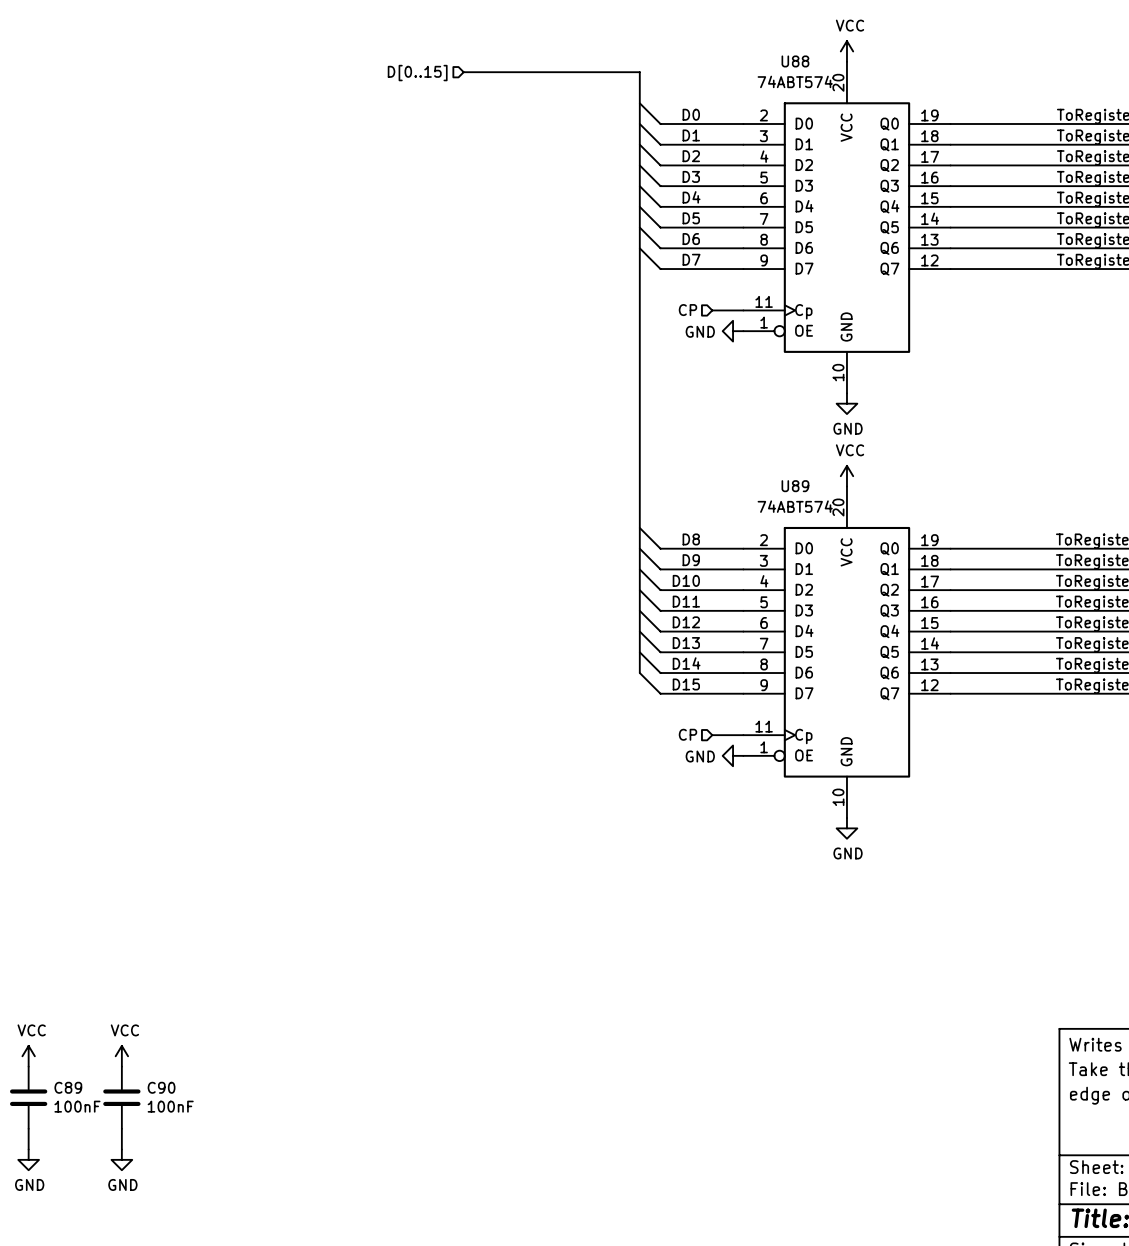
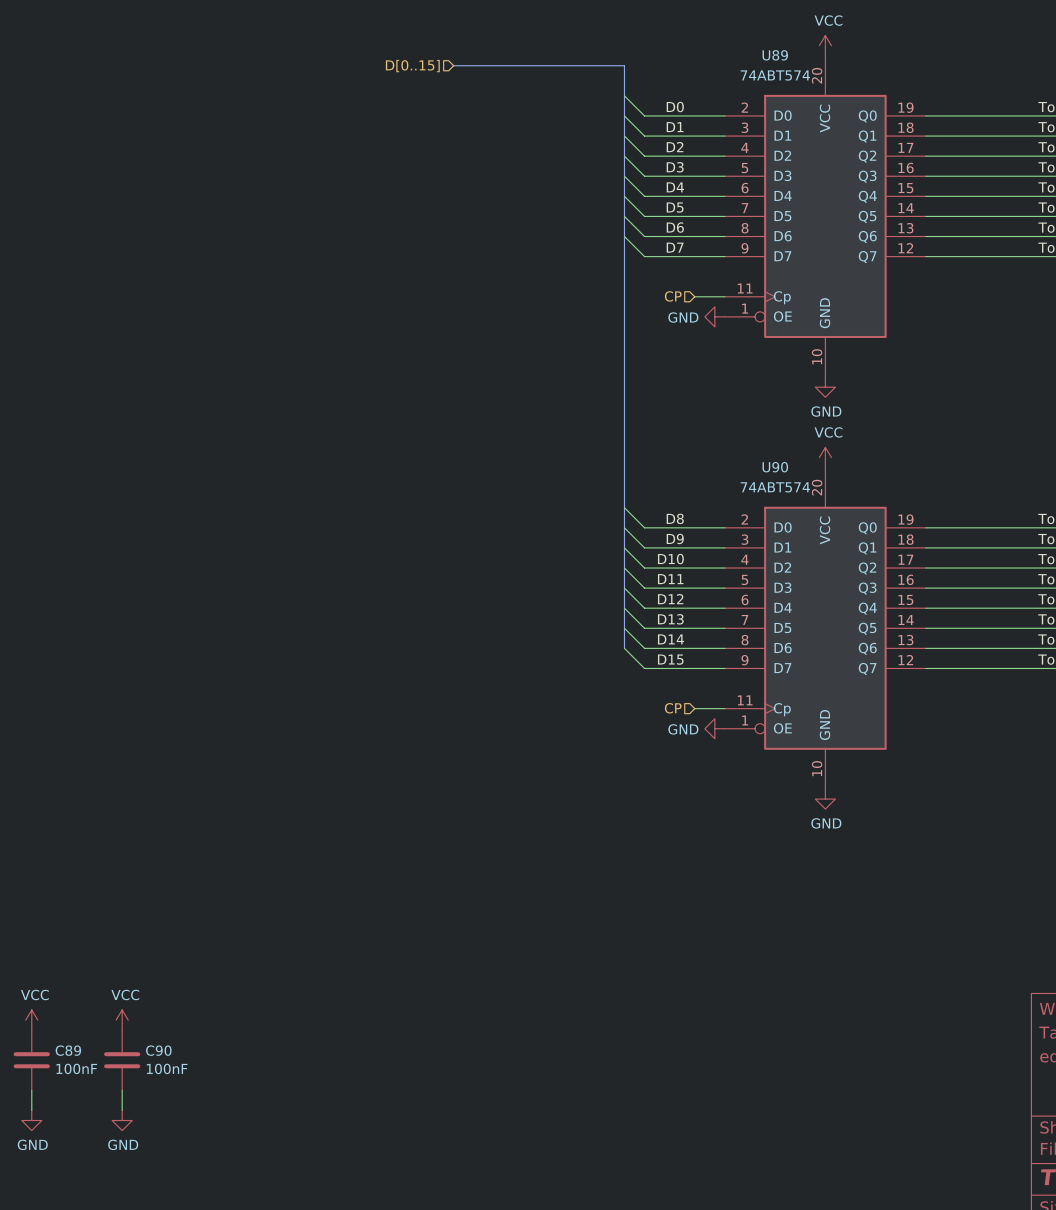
U88 name: U88 (795, 61) -> U89 (775, 55)
U89 name: U89 (795, 486) -> U90 (775, 467)

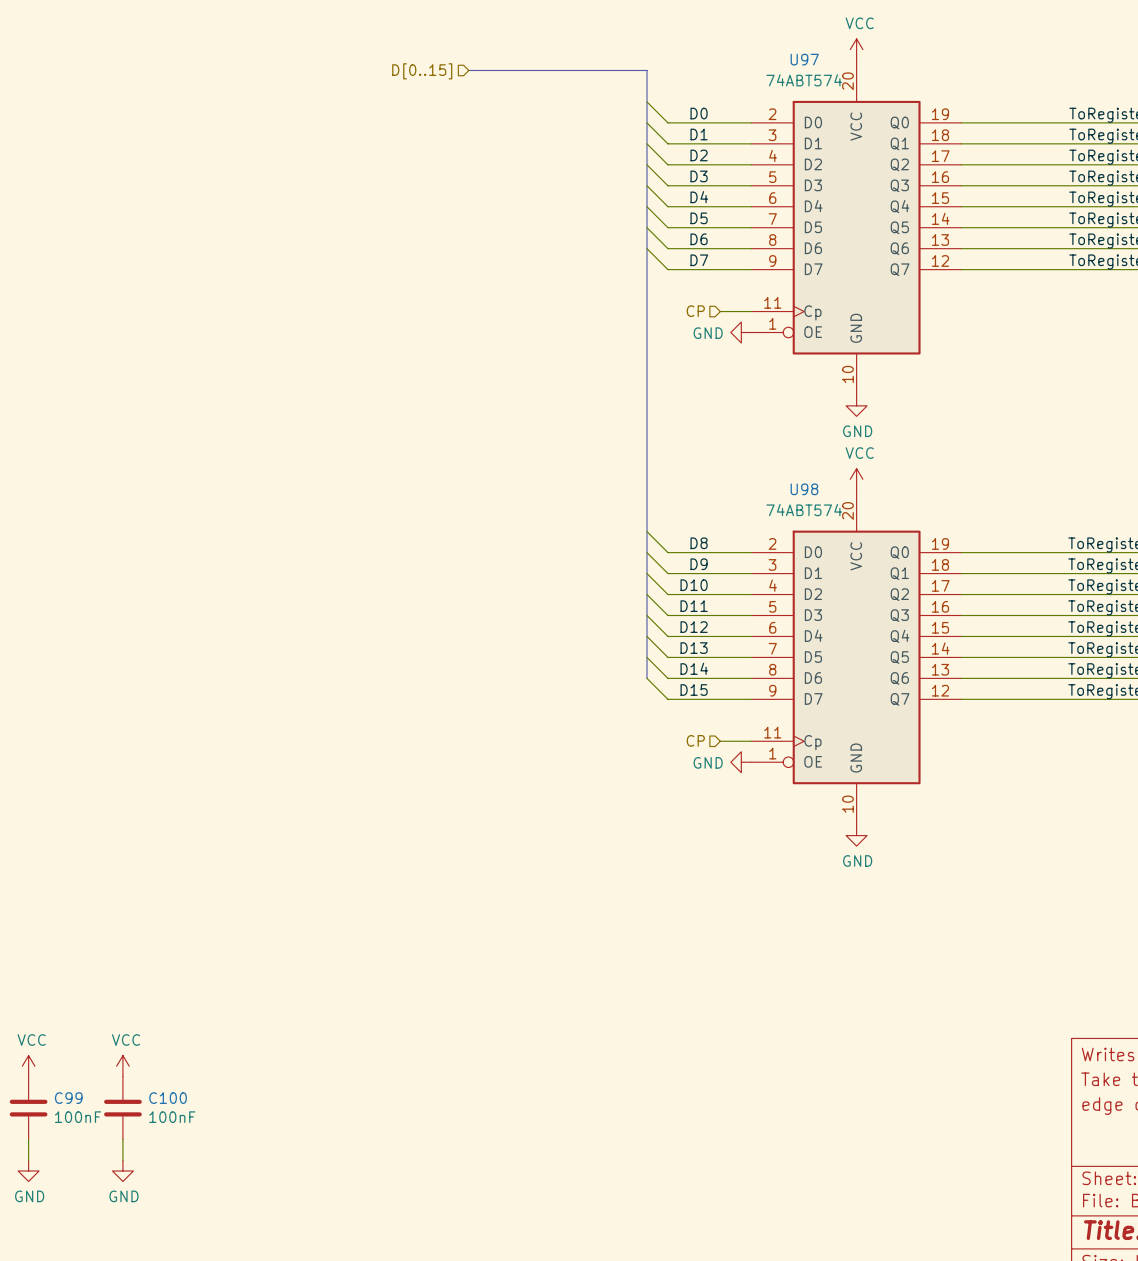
U89 name: U89 (775, 55) -> U97 (804, 59)
U90 name: U90 (775, 467) -> U98 (804, 489)
C89 name: C89 (68, 1050) -> C99 (68, 1098)
C90 name: C90 (158, 1050) -> C100 (168, 1098)

